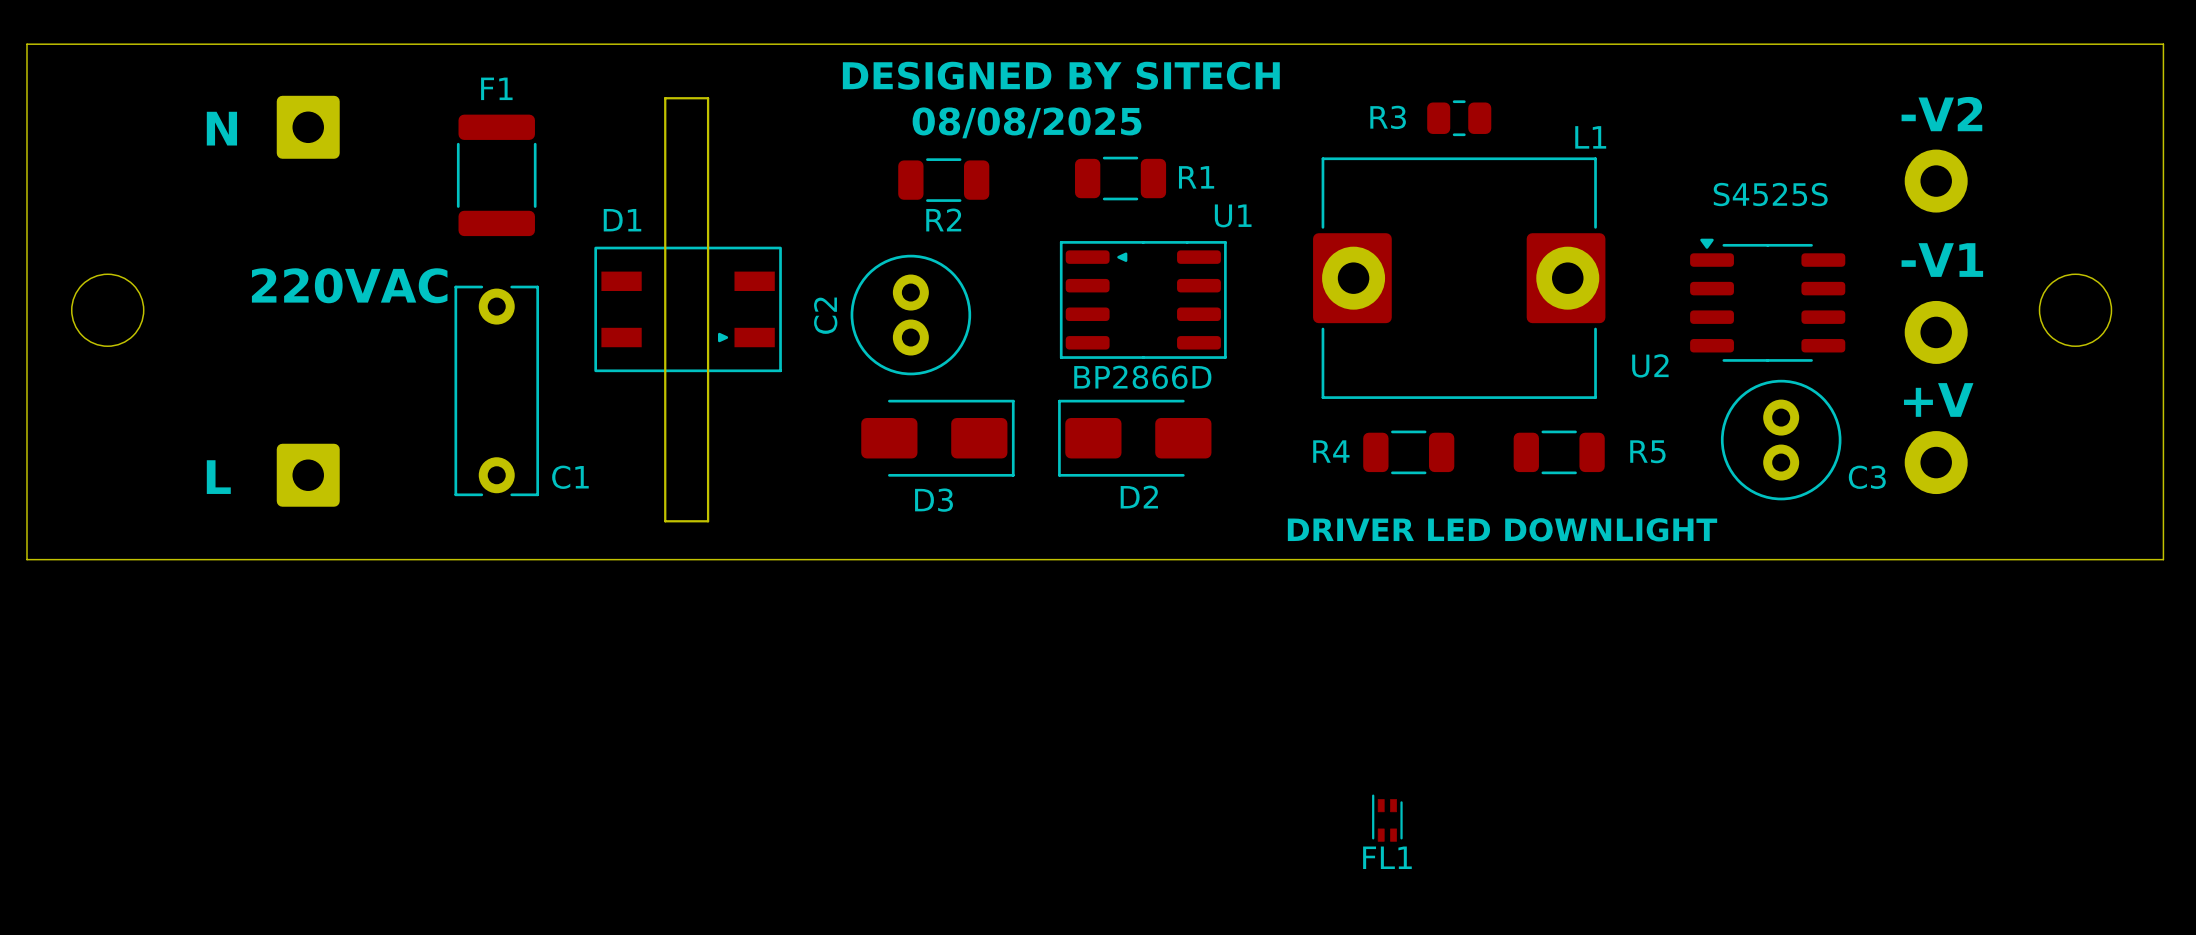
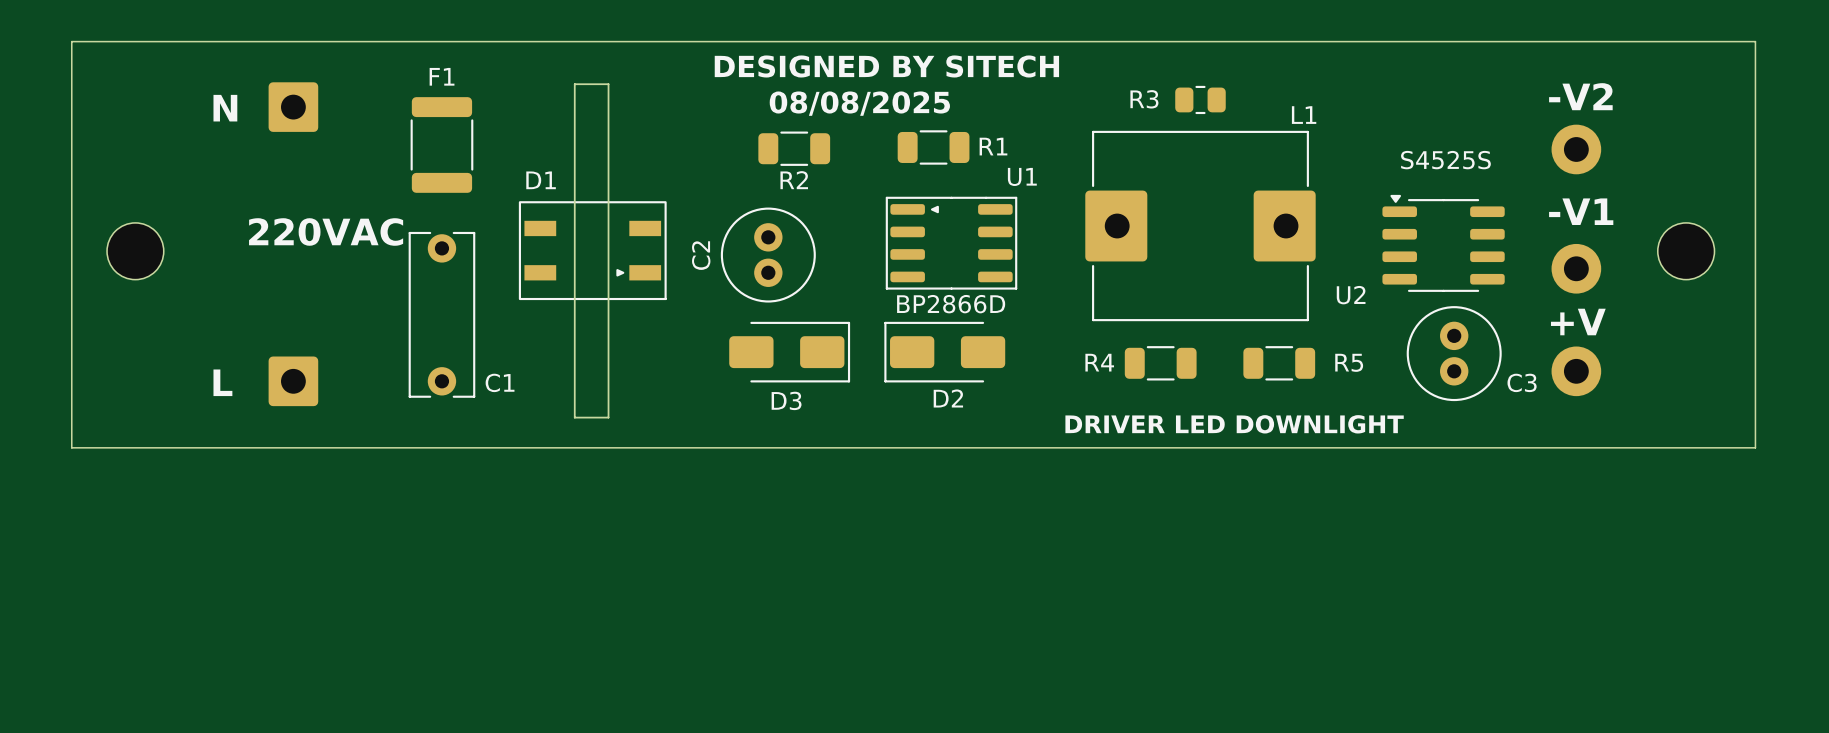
FL1: (1387, 818) -> none

